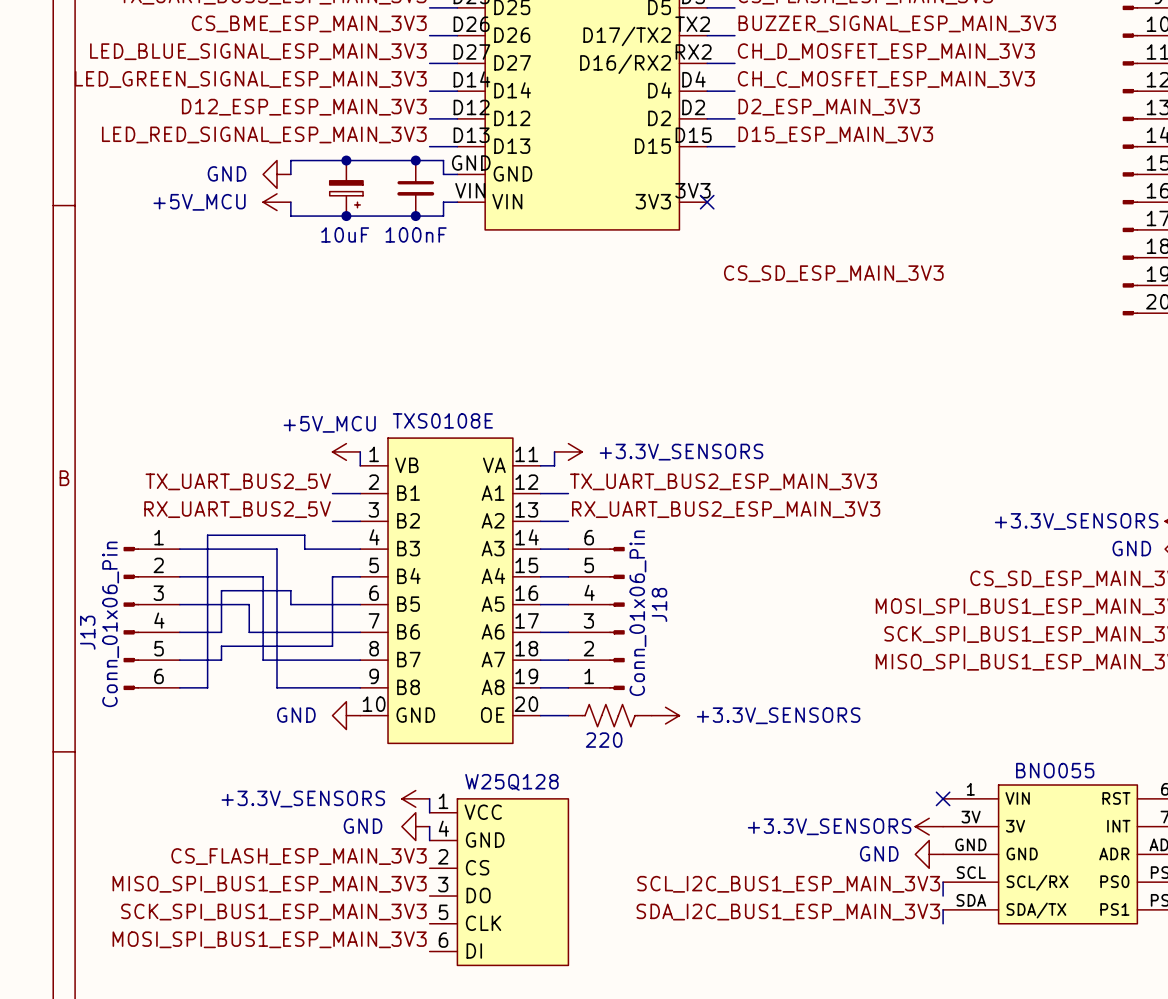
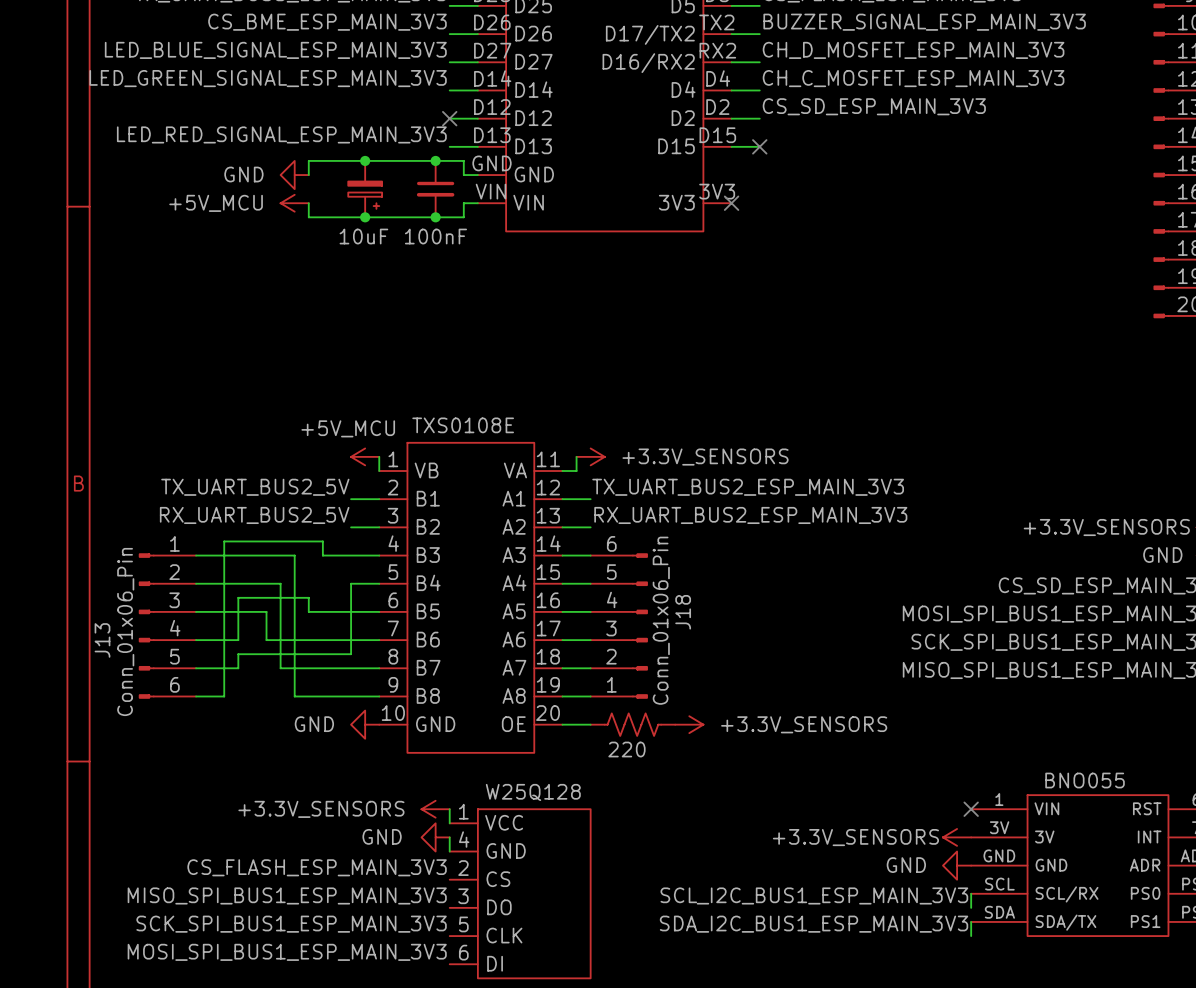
label: D12_ESP_ESP_MAIN_3V3 (304, 107) -> none
label: D2_ESP_MAIN_3V3 (829, 107) -> CS_SD_ESP_MAIN_3V3 (874, 106)
no-connect mark: none -> (449, 118)
label: D15_ESP_MAIN_3V3 (835, 134) -> none
no-connect mark: none -> (759, 146)
label: CS_SD_ESP_MAIN_3V3 (833, 273) -> none

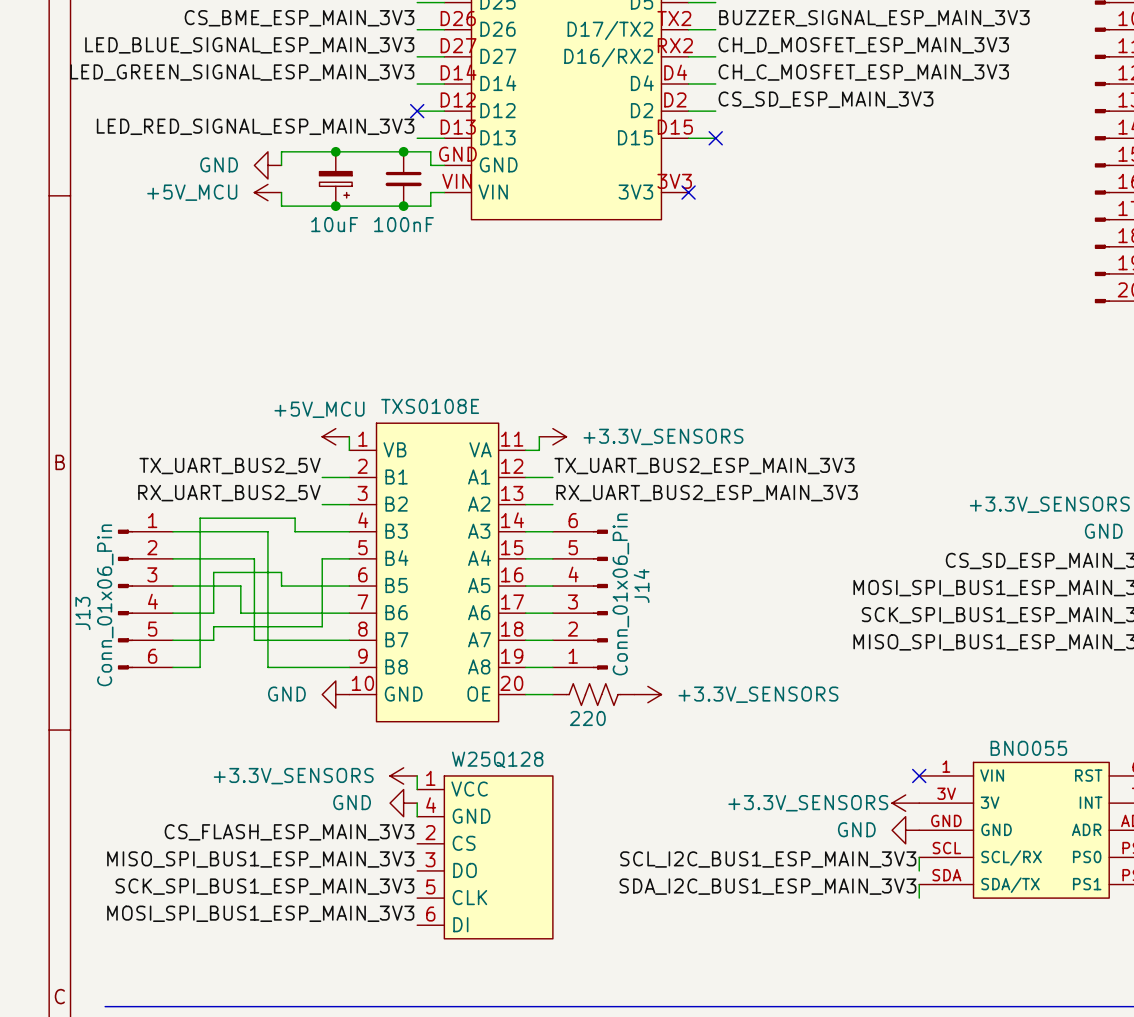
J18 name: J18 (683, 612) -> J14 (641, 586)

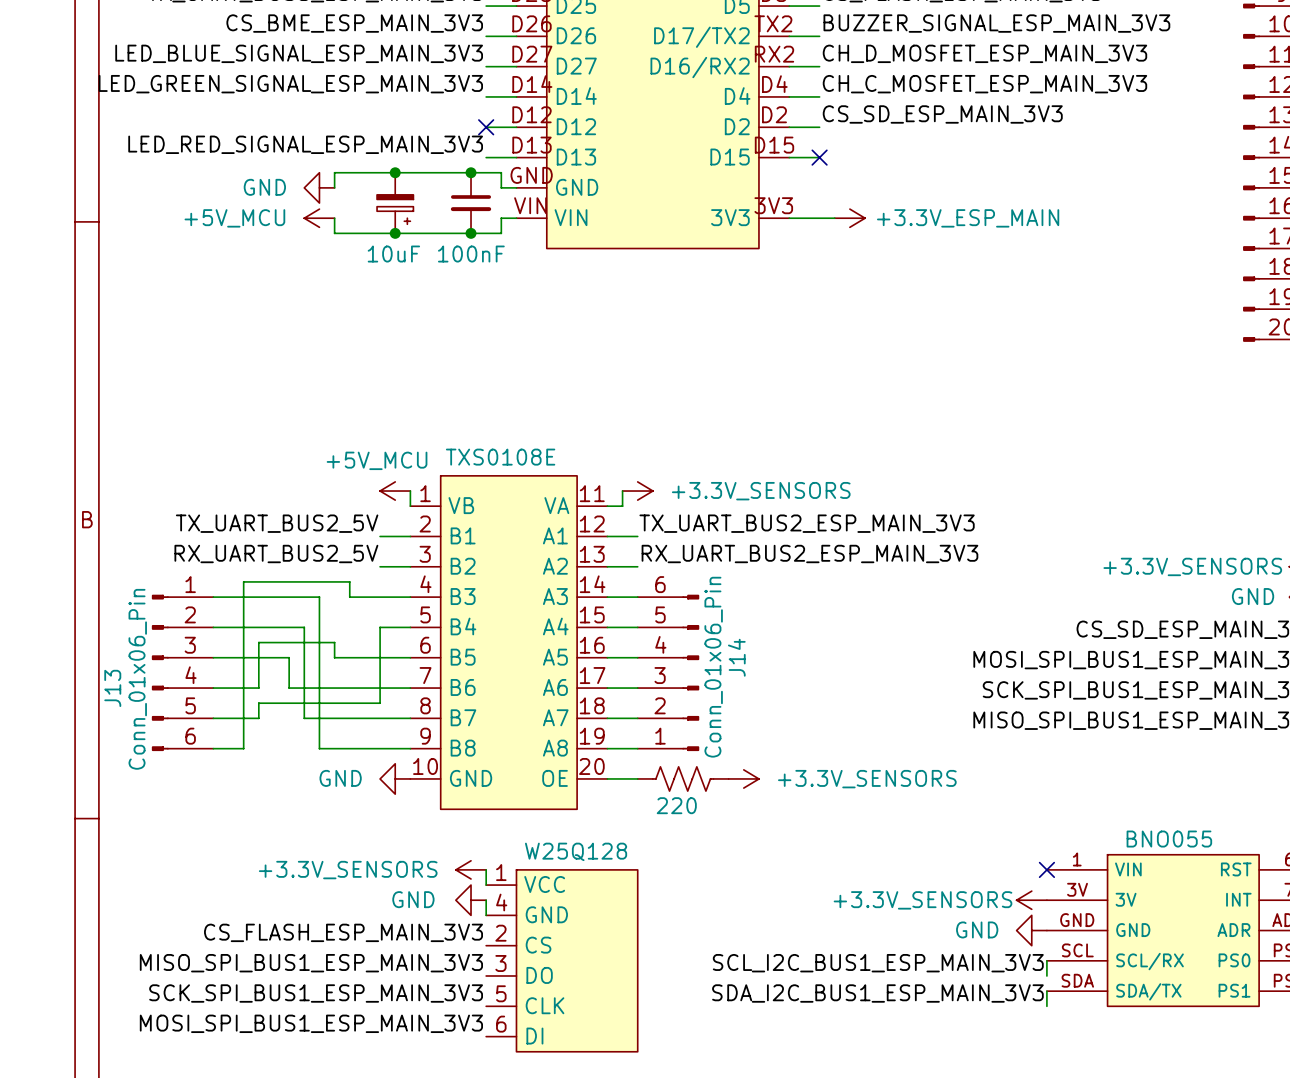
wire: none -> (789, 218) (834, 218)
no-connect mark: (688, 192) -> none
power symbol: none -> +3.3V_ESP_MAIN (849, 218)

